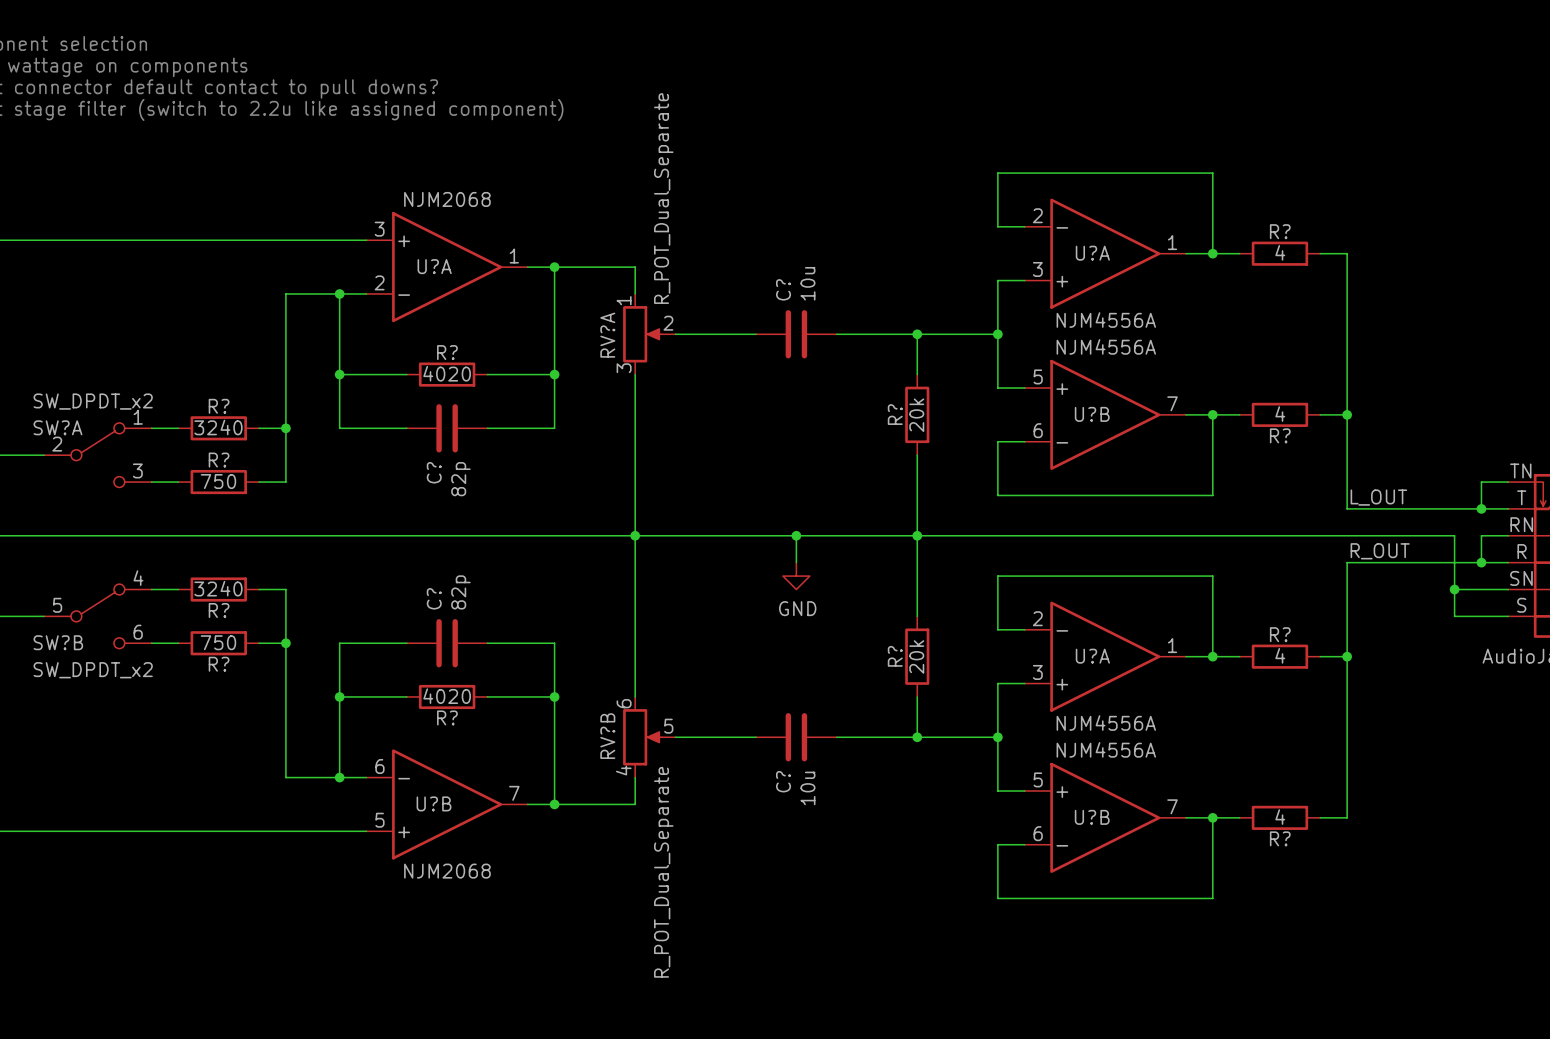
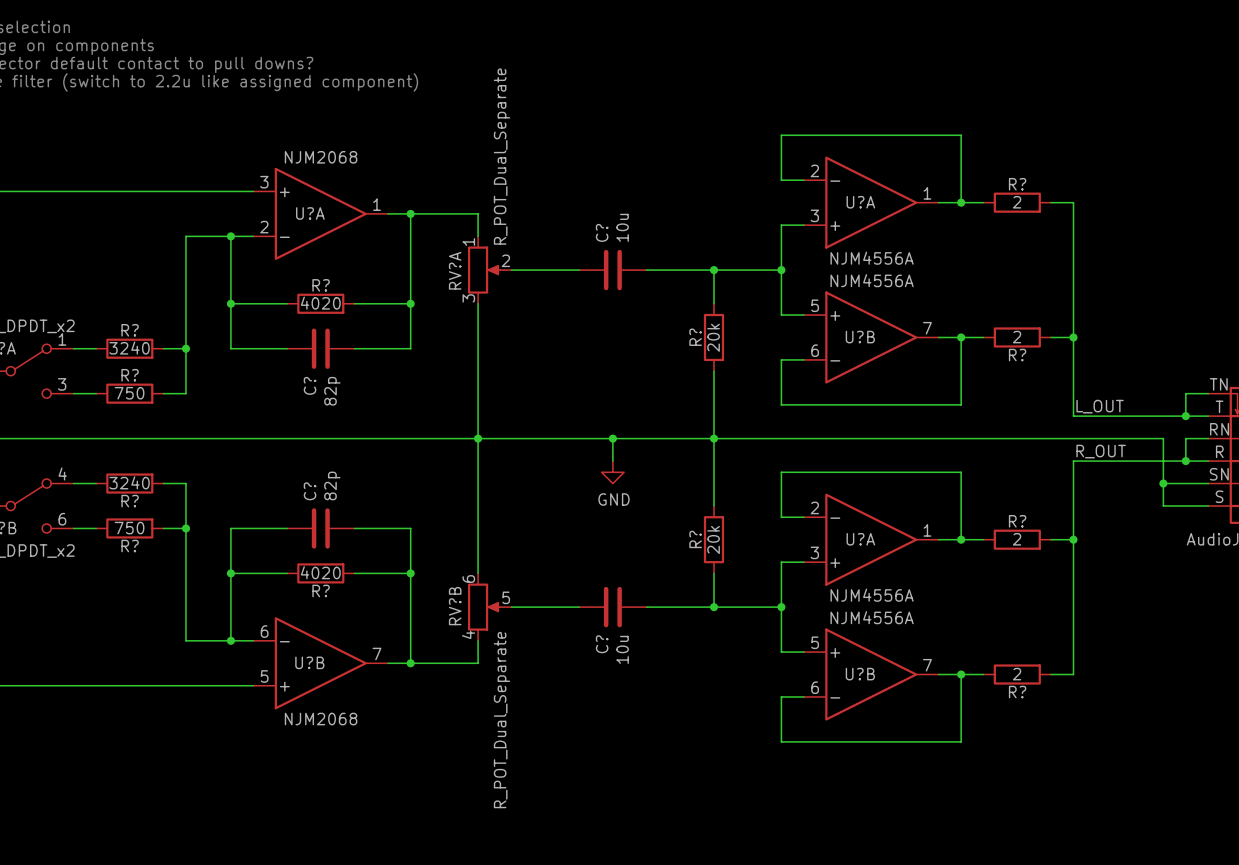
R? value: 4 (1280, 252) -> 2 (1017, 202)
R? value: 4 (1280, 414) -> 2 (1017, 337)
R? value: 4 (1280, 655) -> 2 (1017, 539)
R? value: 4 (1280, 817) -> 2 (1017, 674)

